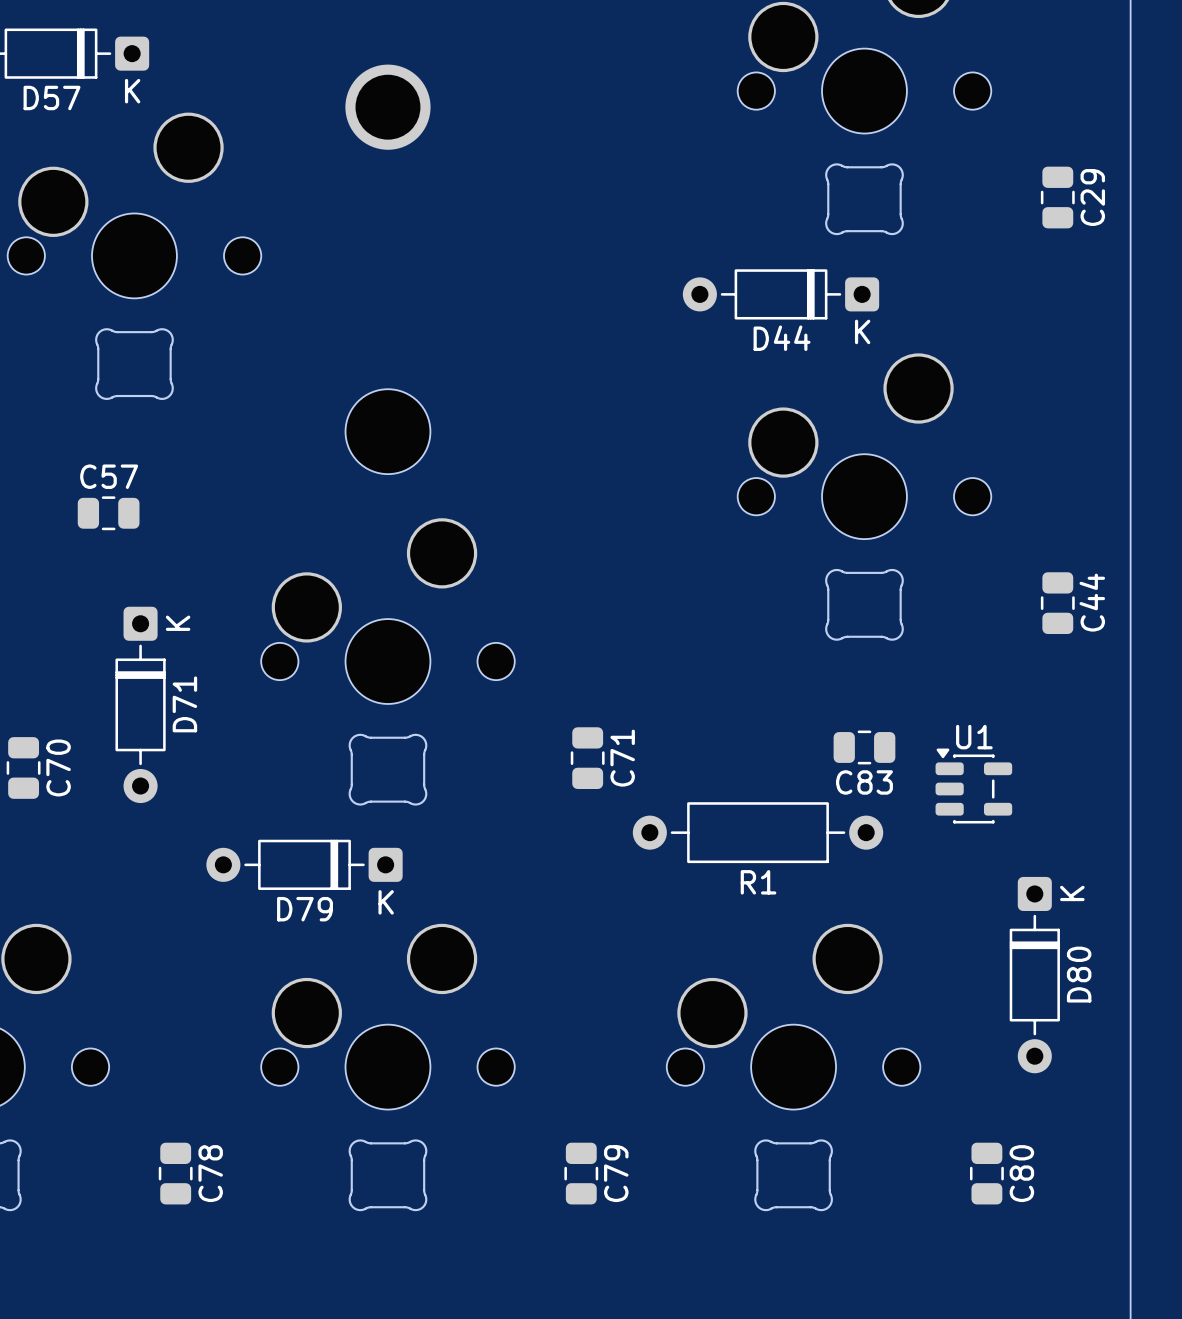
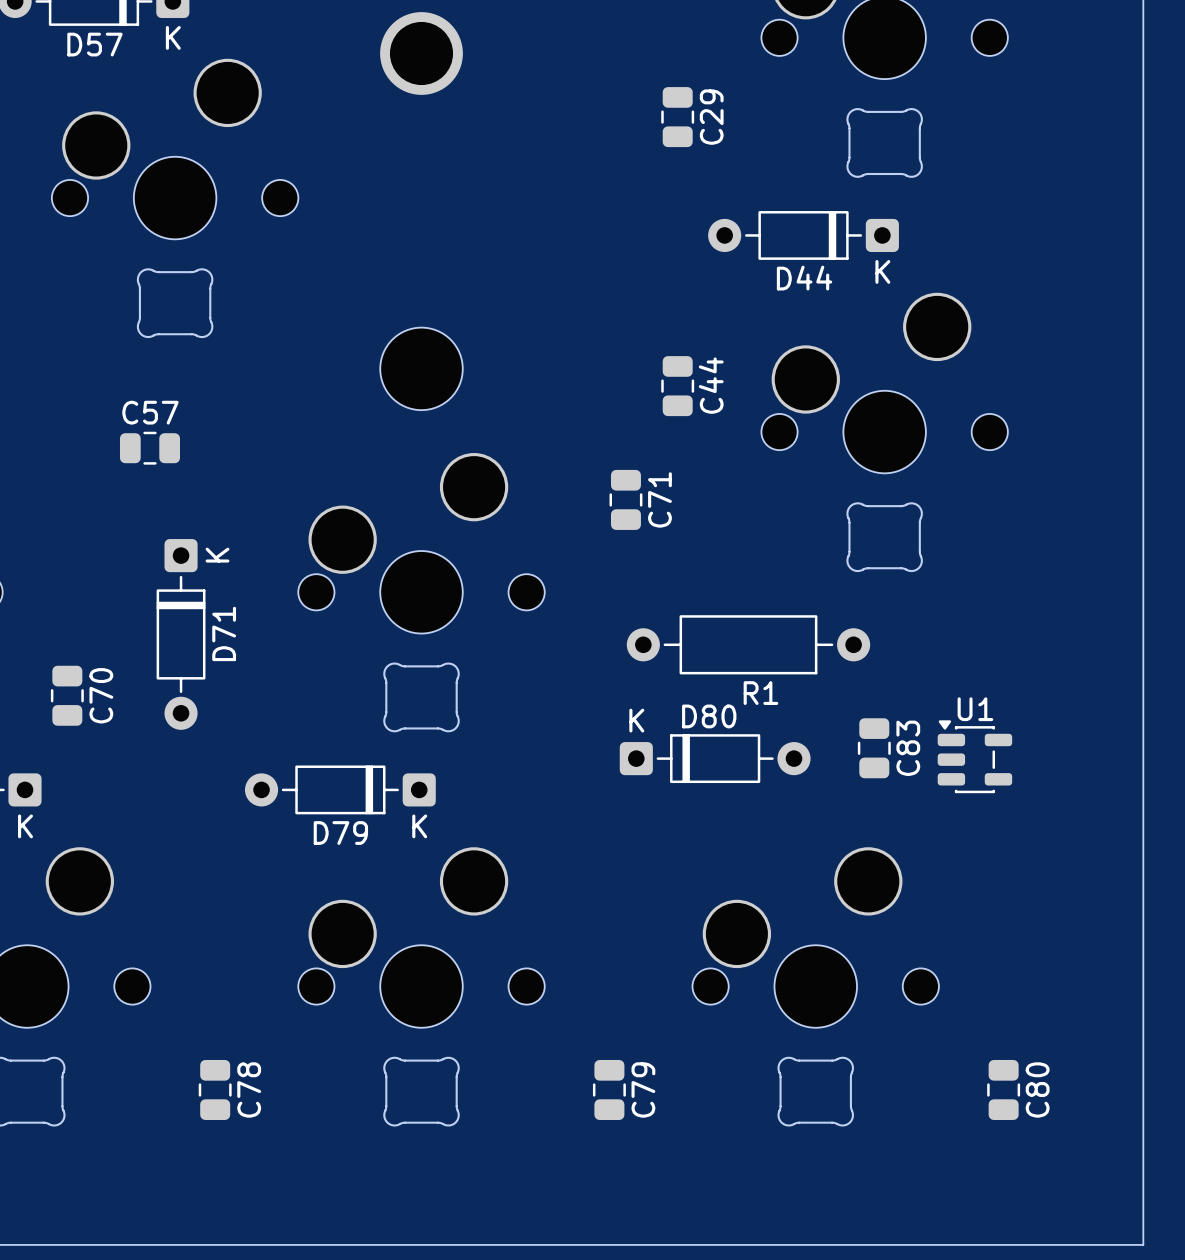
C29 position: (1057, 197) -> (677, 117)
C44 position: (1057, 603) -> (677, 386)
C83 rotation: 0° (864, 747) -> 90° clockwise (874, 748)
C83 position: (864, 747) -> (874, 748)
C71 position: (587, 758) -> (625, 499)
C83 name position: C83 (864, 782) -> C83 (908, 748)
U1 position: (973, 786) -> (974, 756)
R1 position: (758, 832) -> (748, 644)
R1 name position: R1 (758, 882) -> R1 (760, 693)
D80 rotation: 0° (1034, 975) -> 90° counterclockwise (715, 758)
D80 position: (1034, 975) -> (715, 758)

